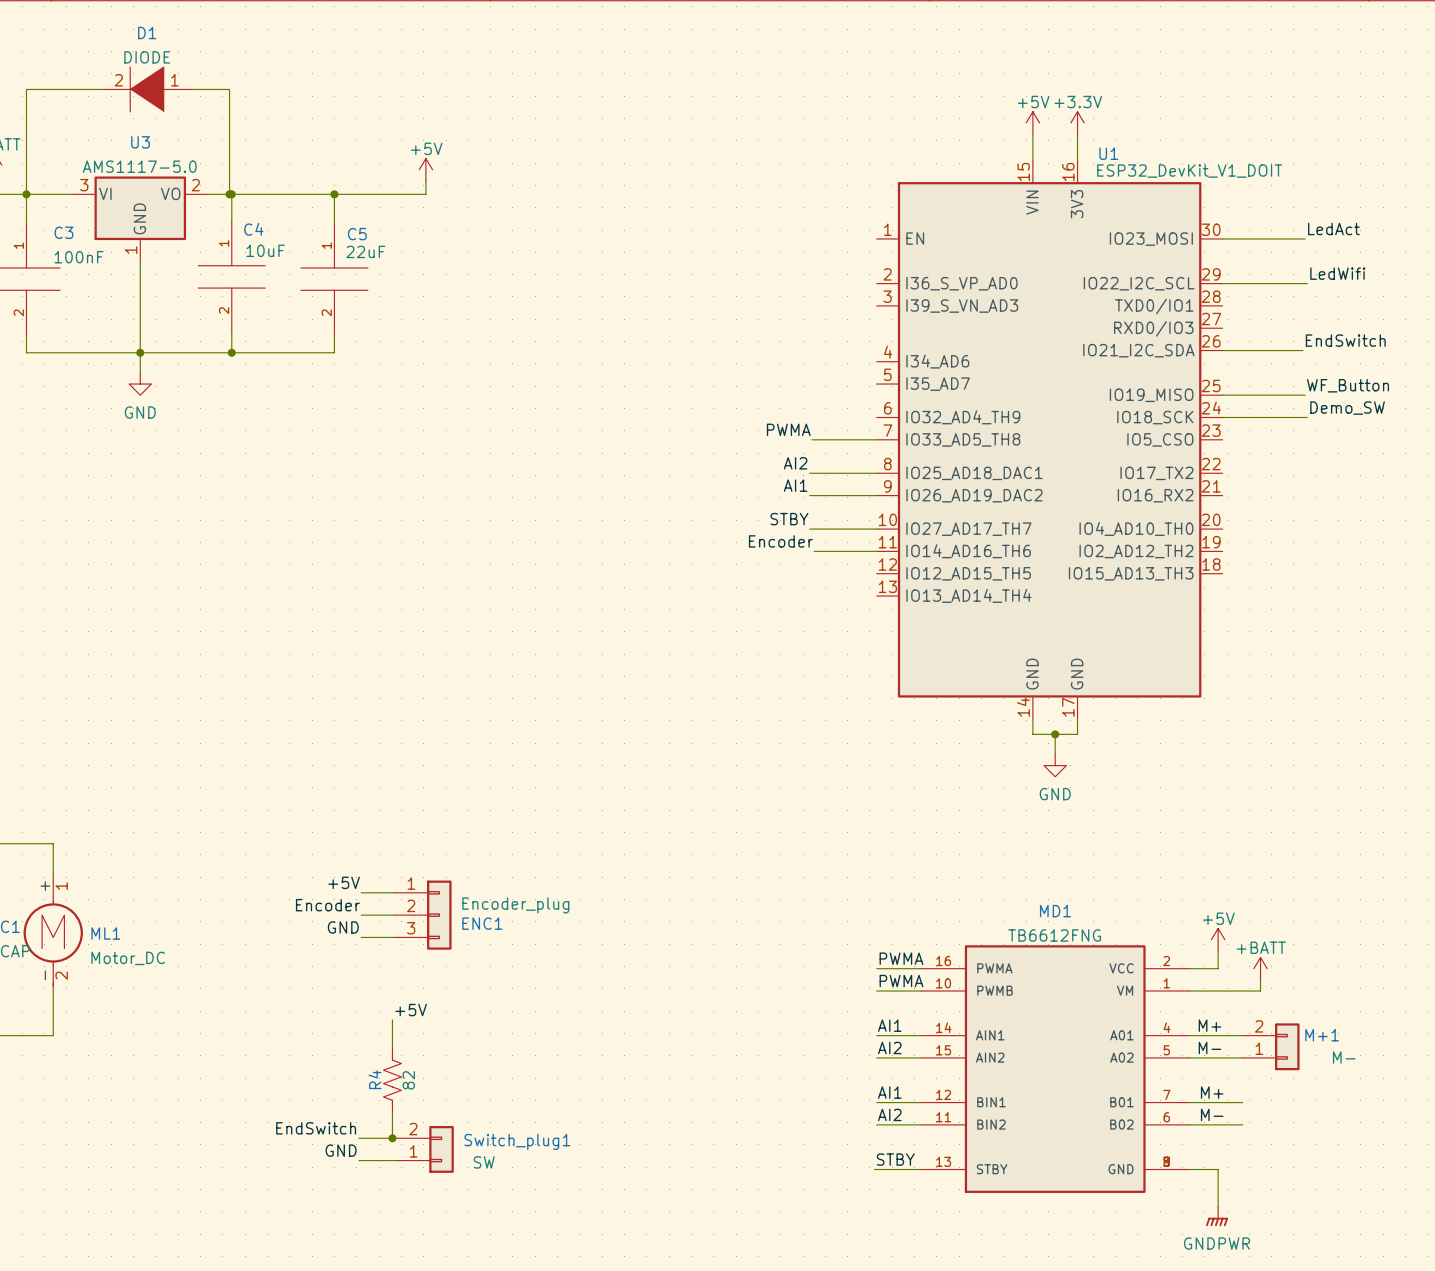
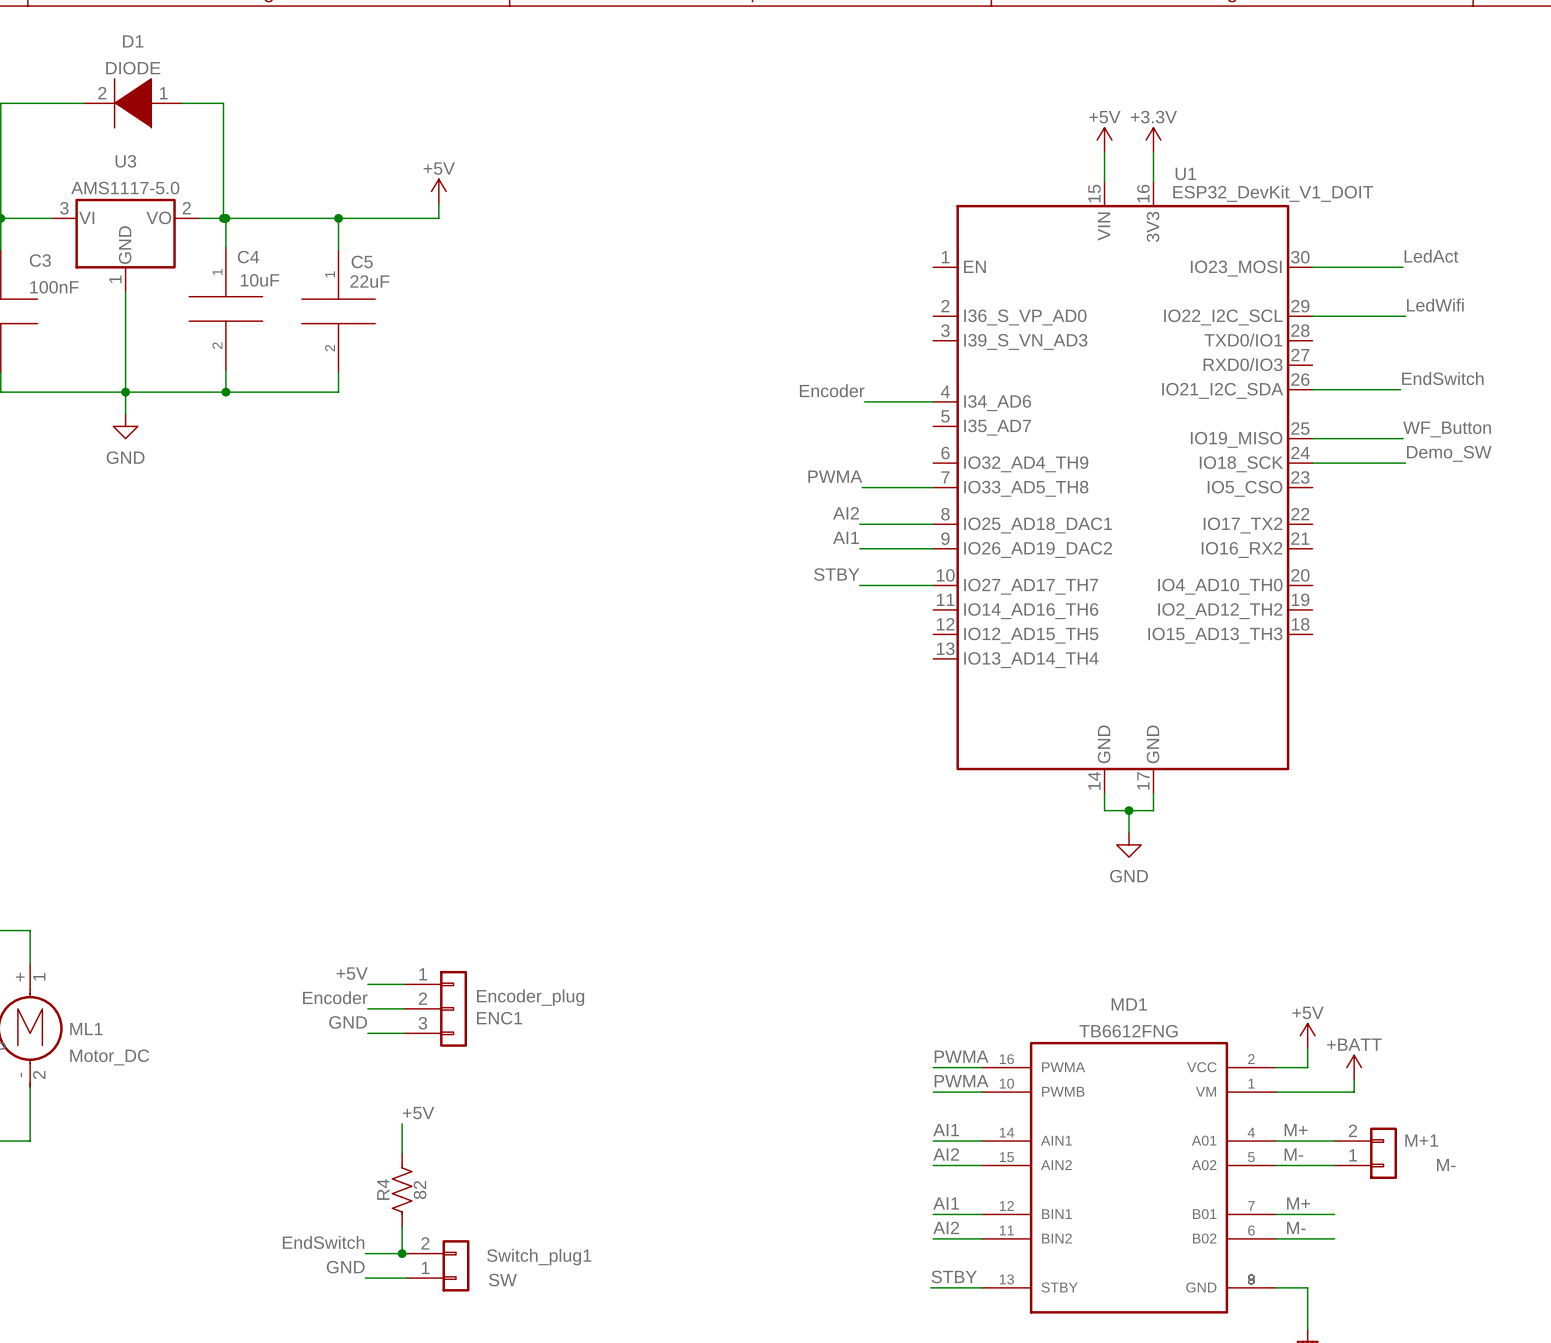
label position: Encoder (780, 541) -> Encoder (832, 390)
wire: (814, 551) (876, 551) -> (864, 401) (933, 401)

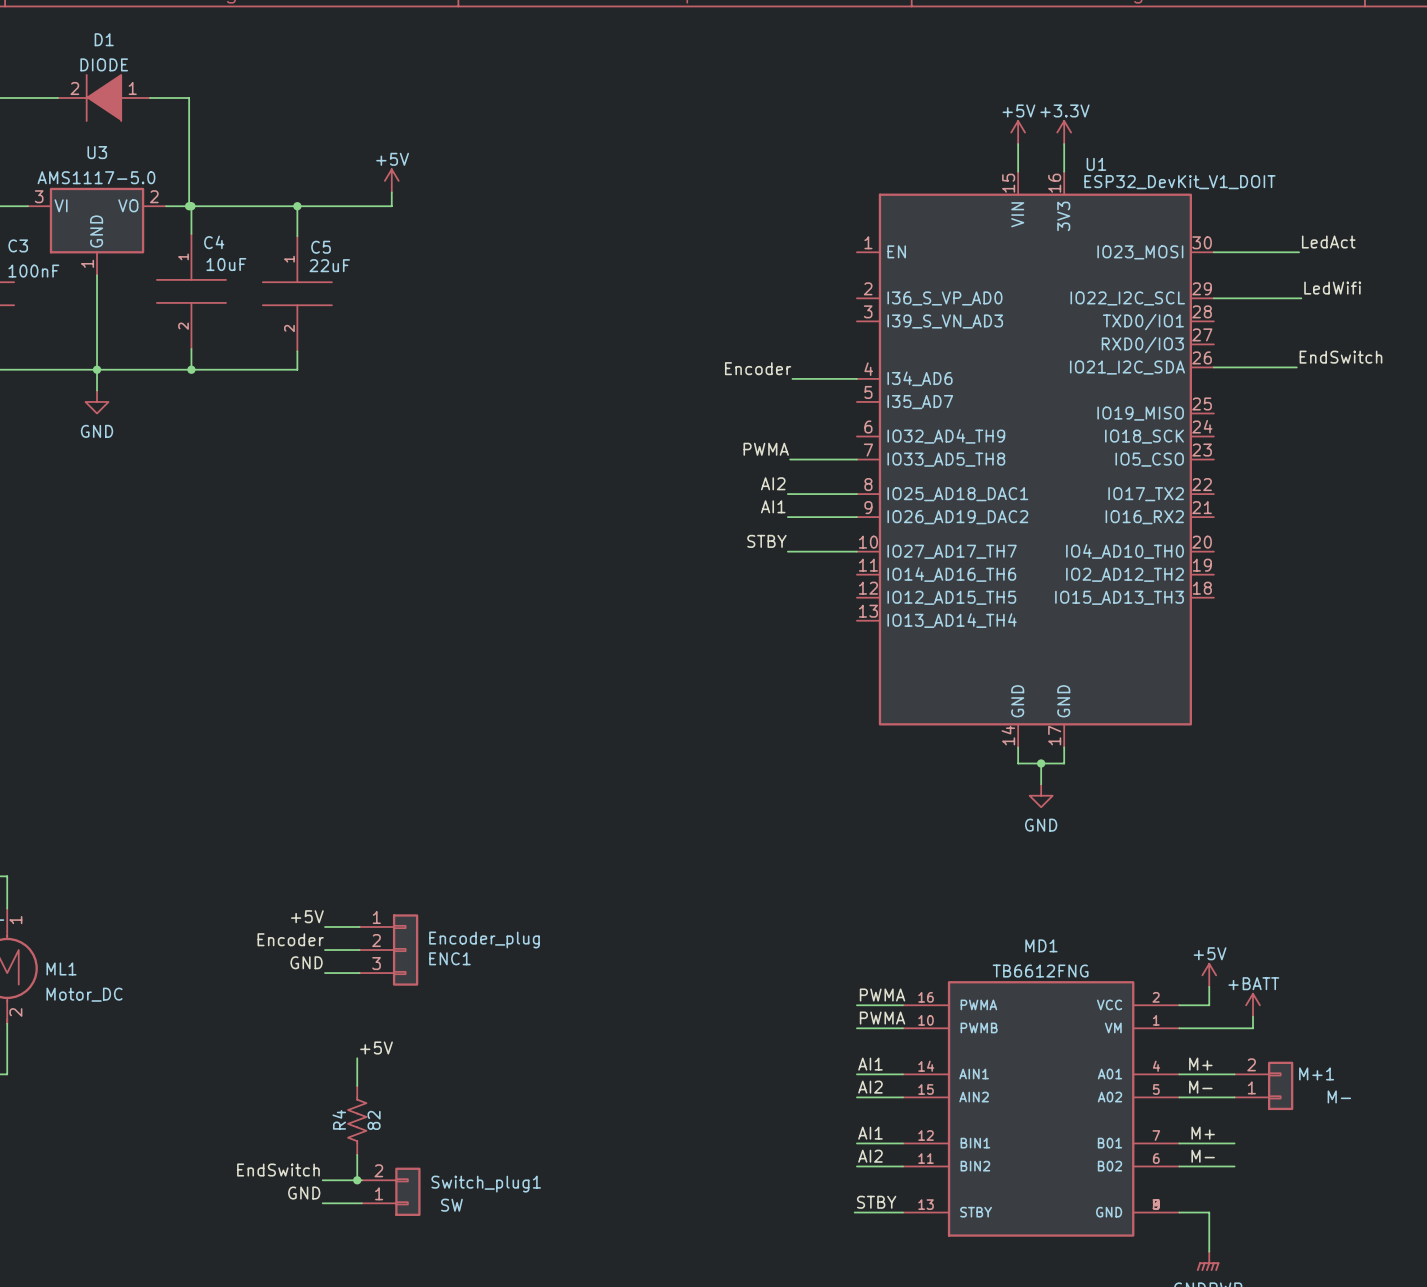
label: WF_Button (1447, 429) -> none
wire: (1312, 438) (1403, 438) -> none
label: Demo_SW (1449, 453) -> none
wire: (1312, 463) (1405, 463) -> none

